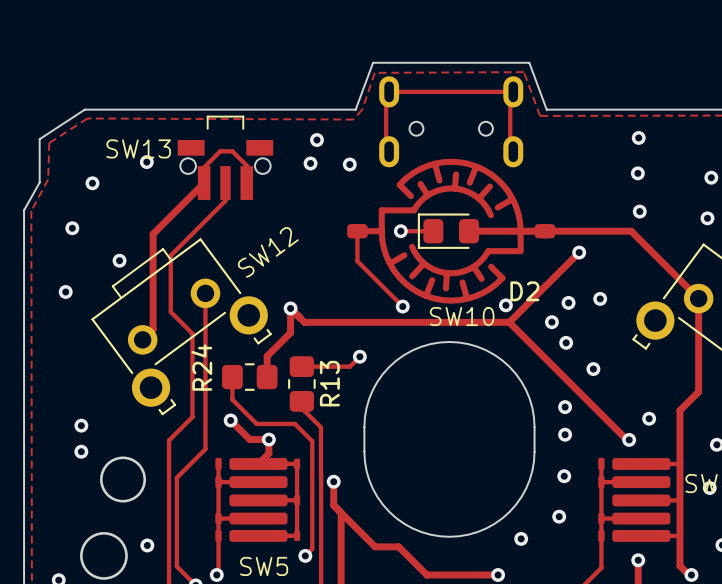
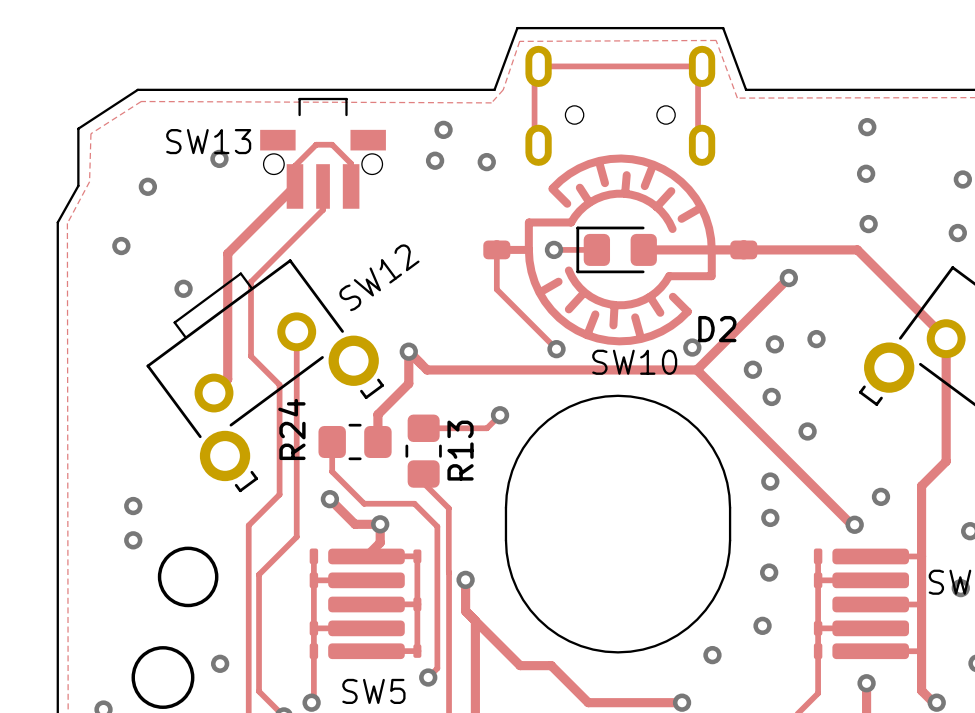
via: (65, 291) -> none

